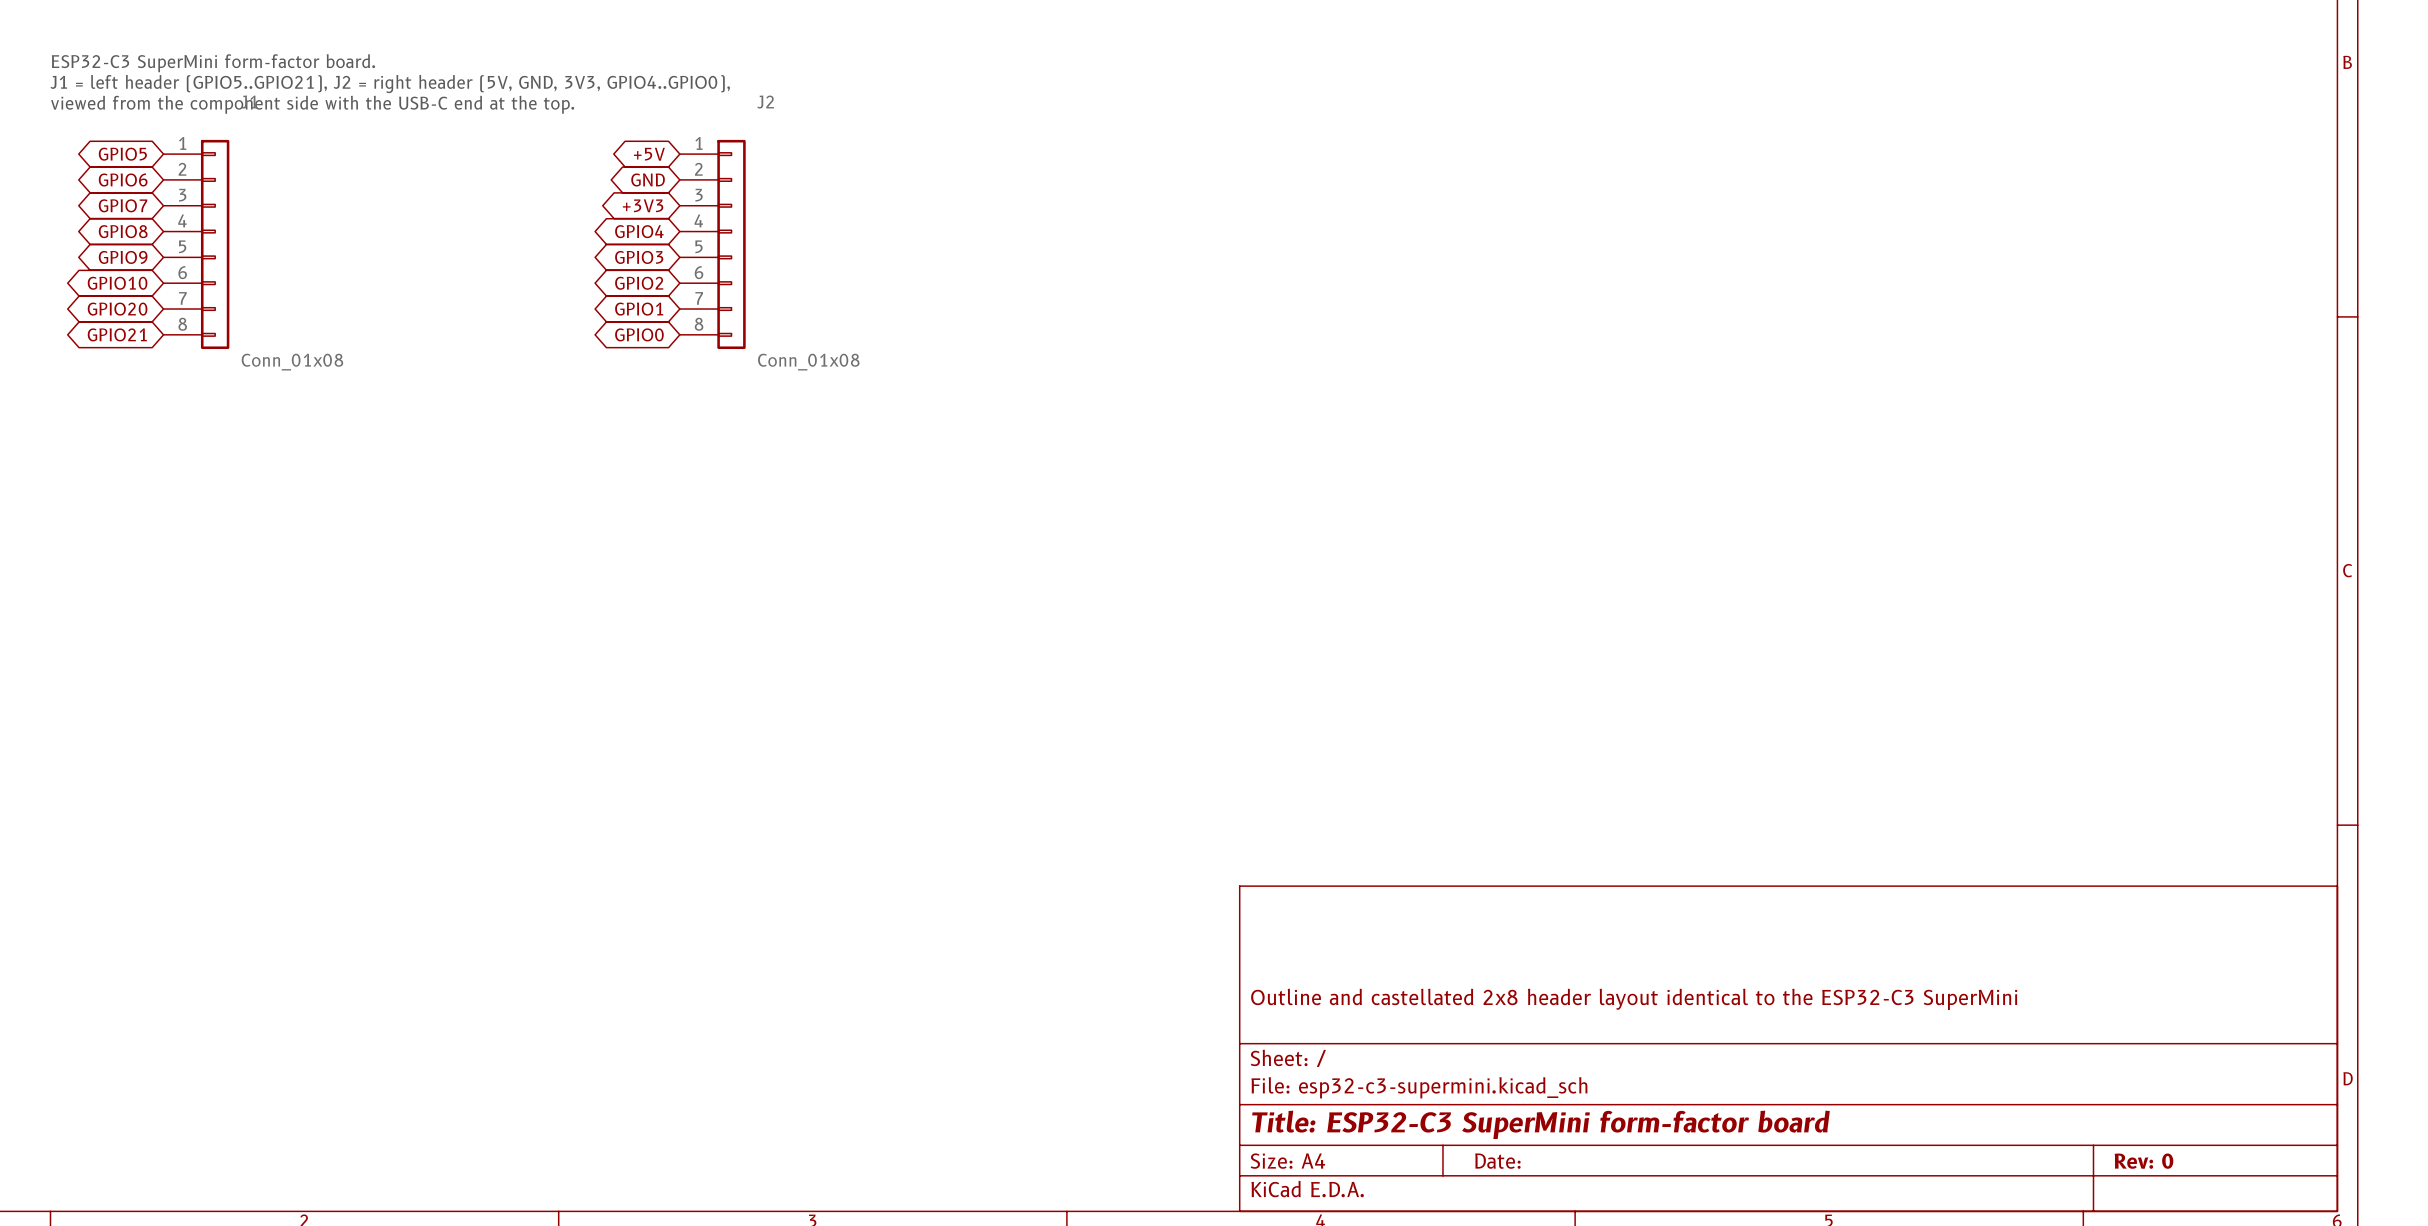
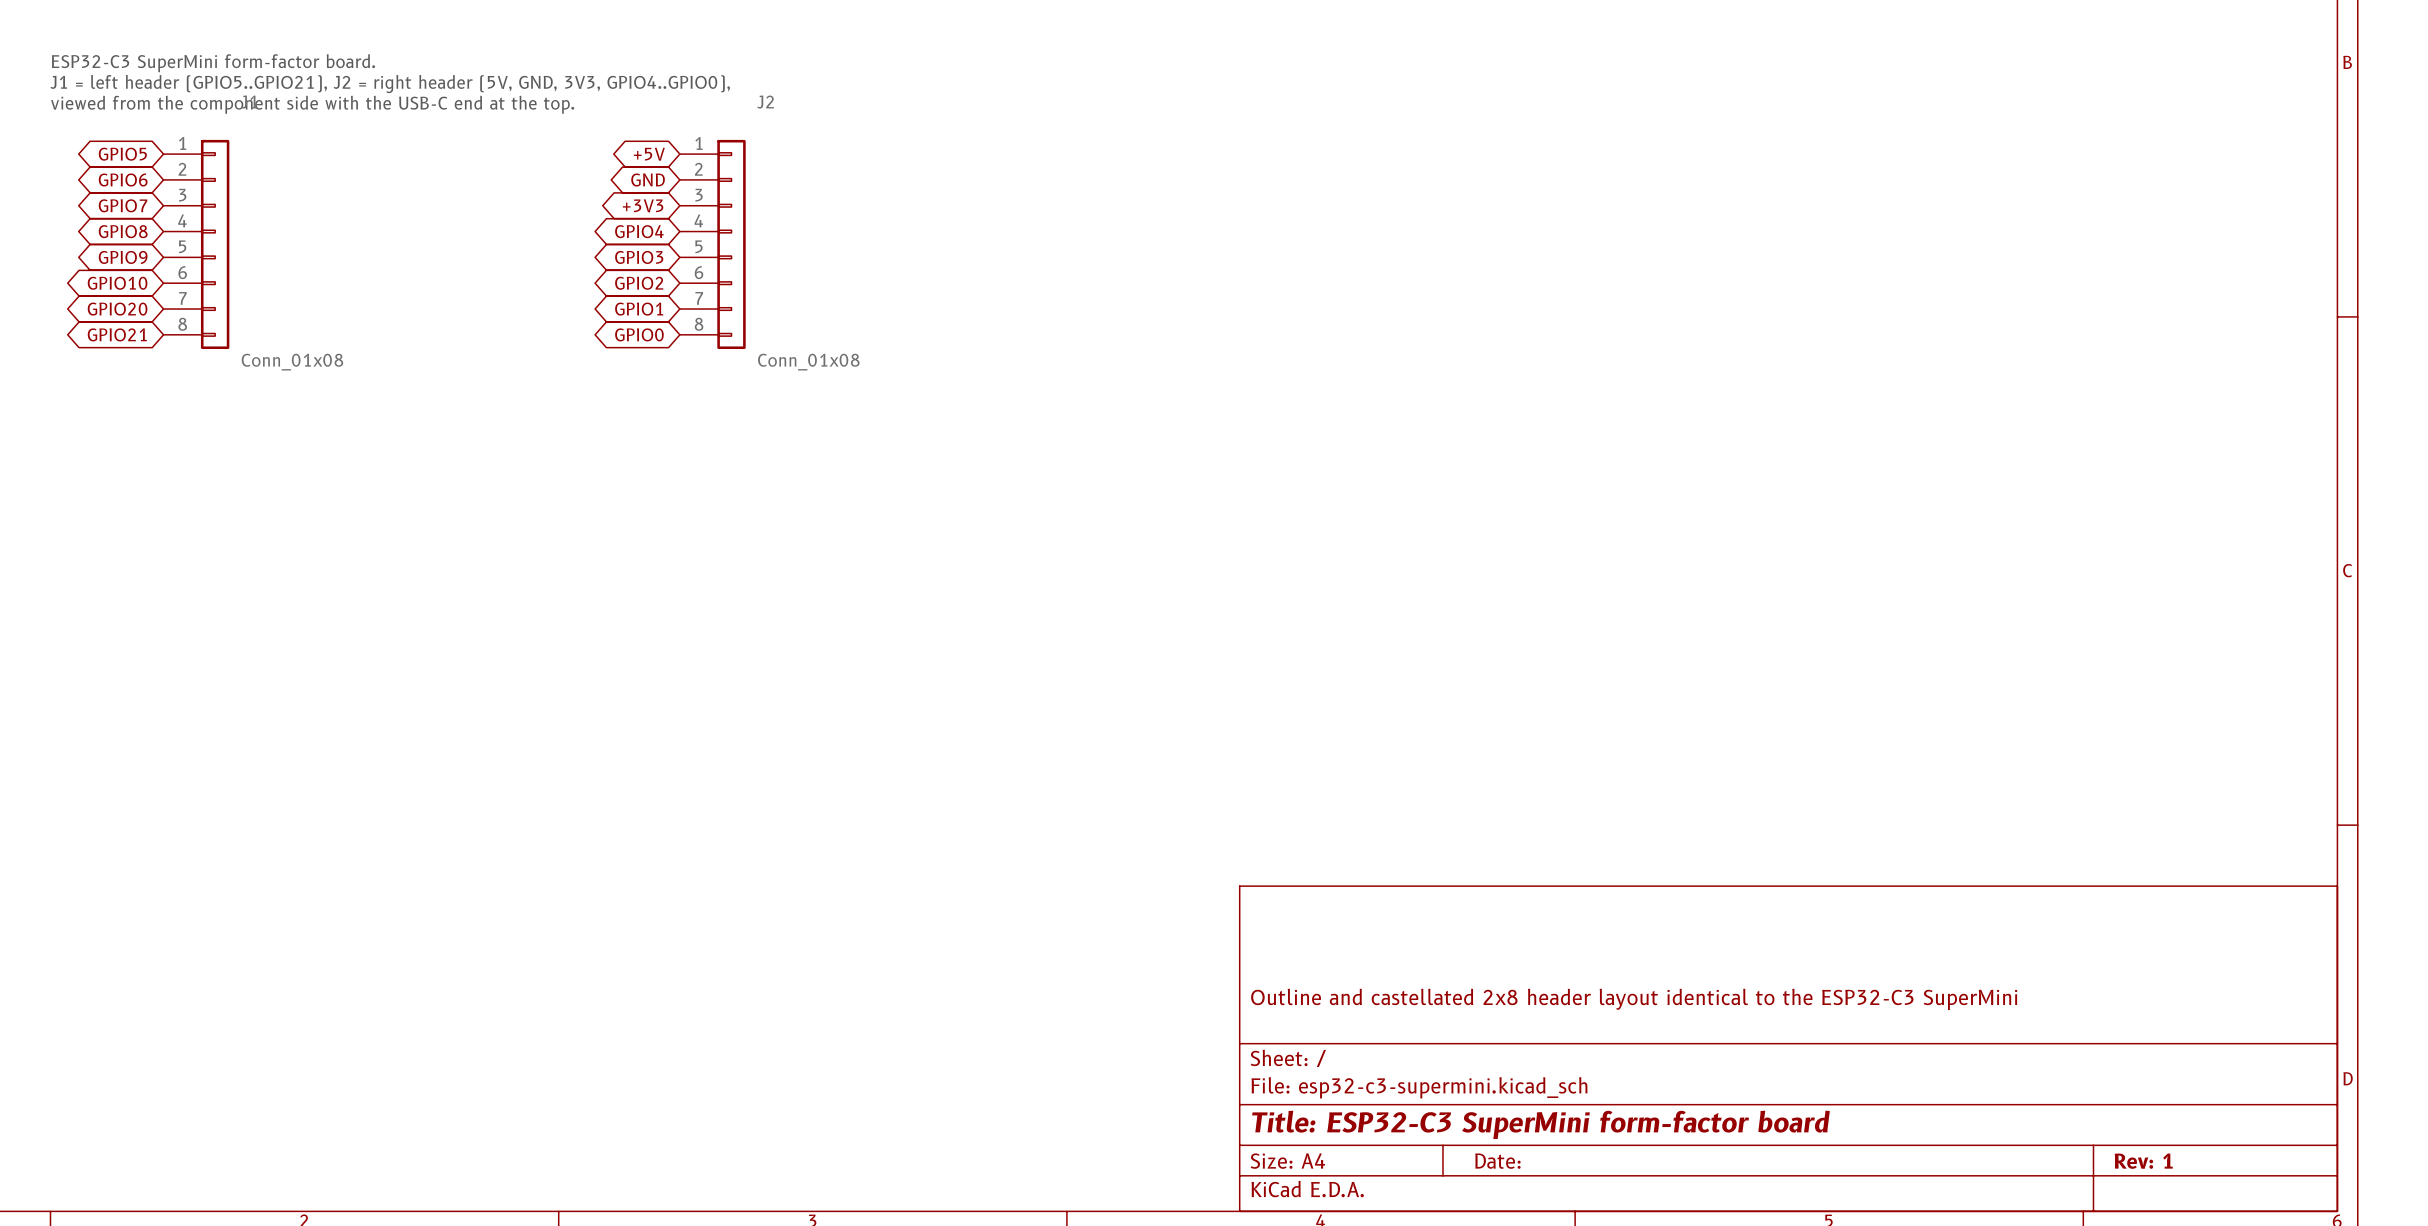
title block: Rev: 0 (2143, 1161) -> Rev: 1 (2143, 1161)

